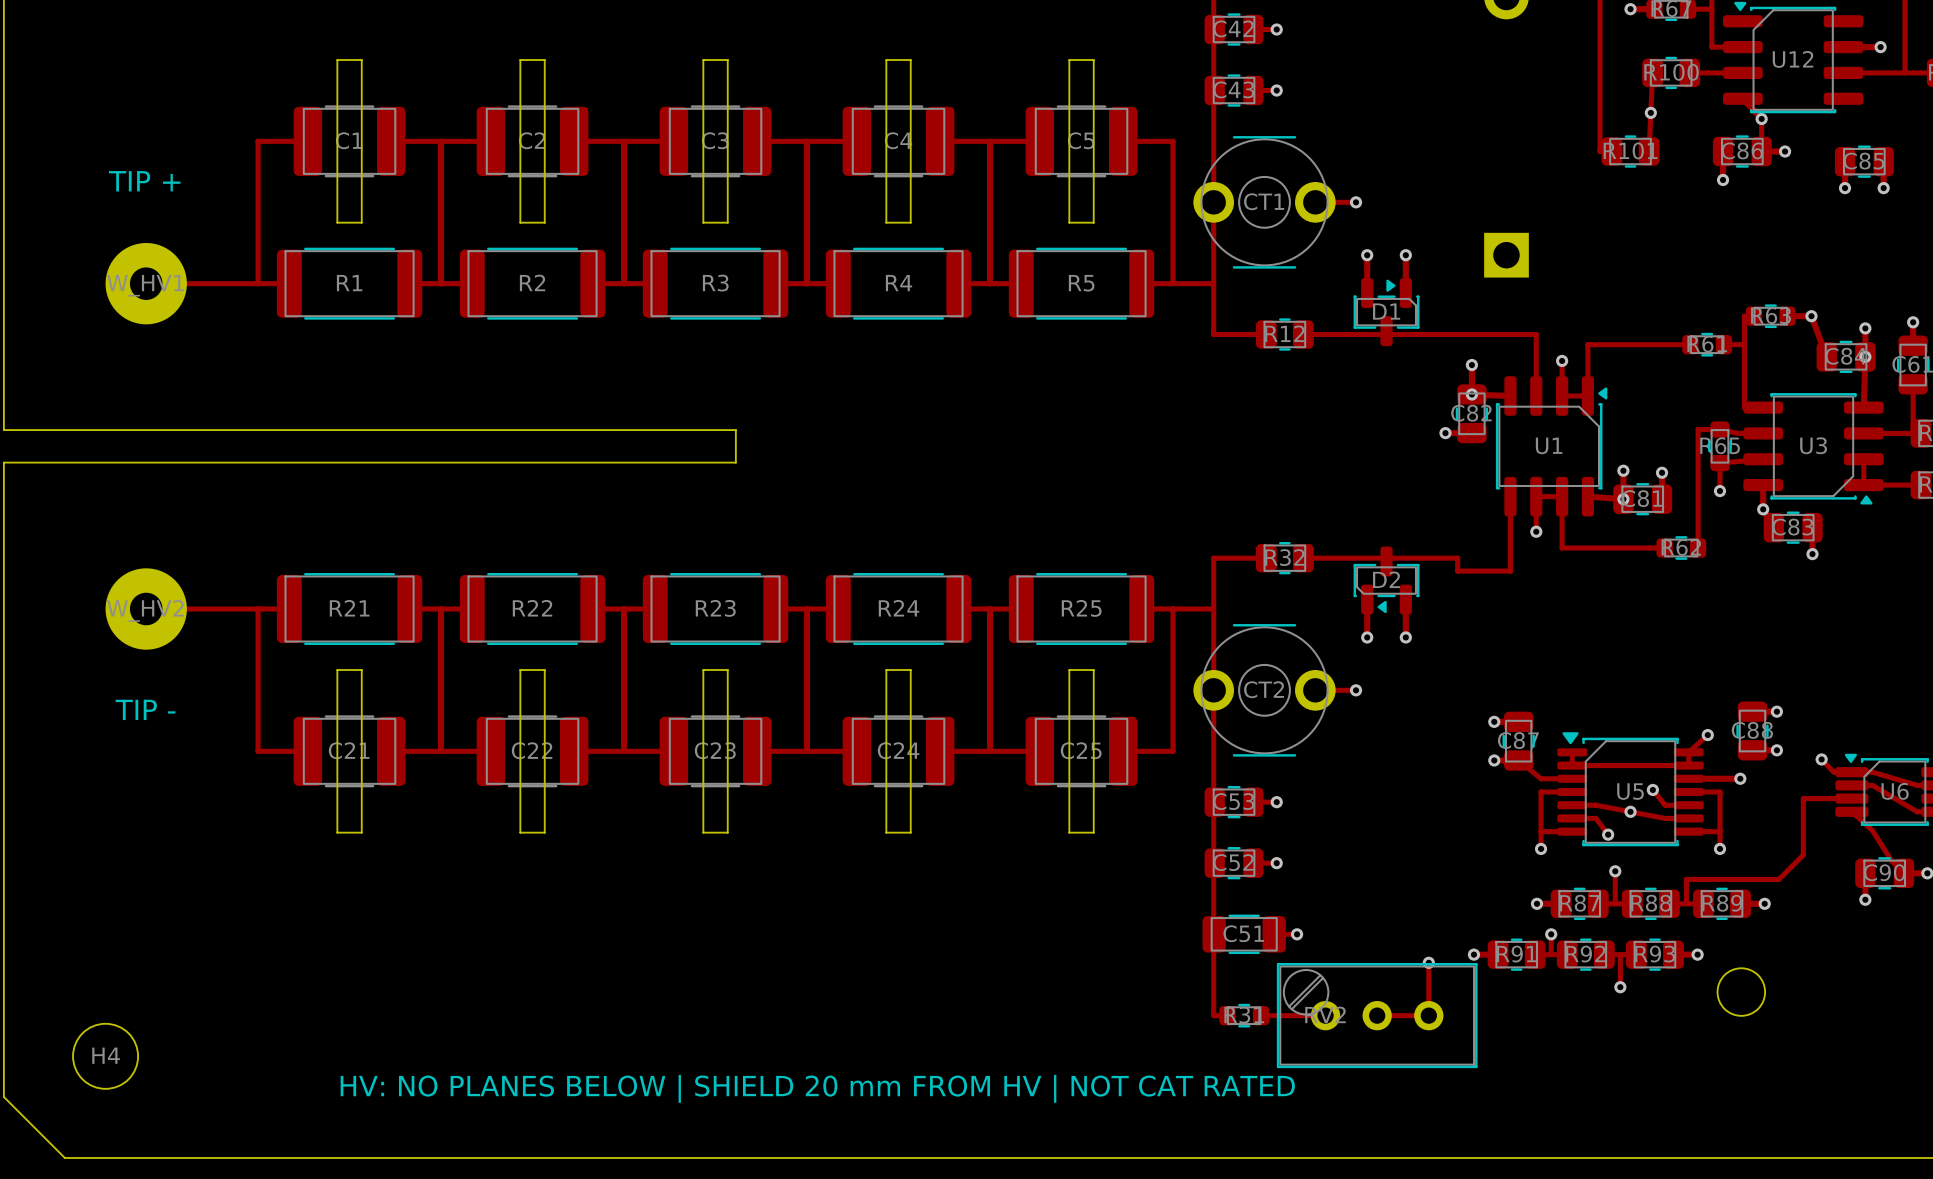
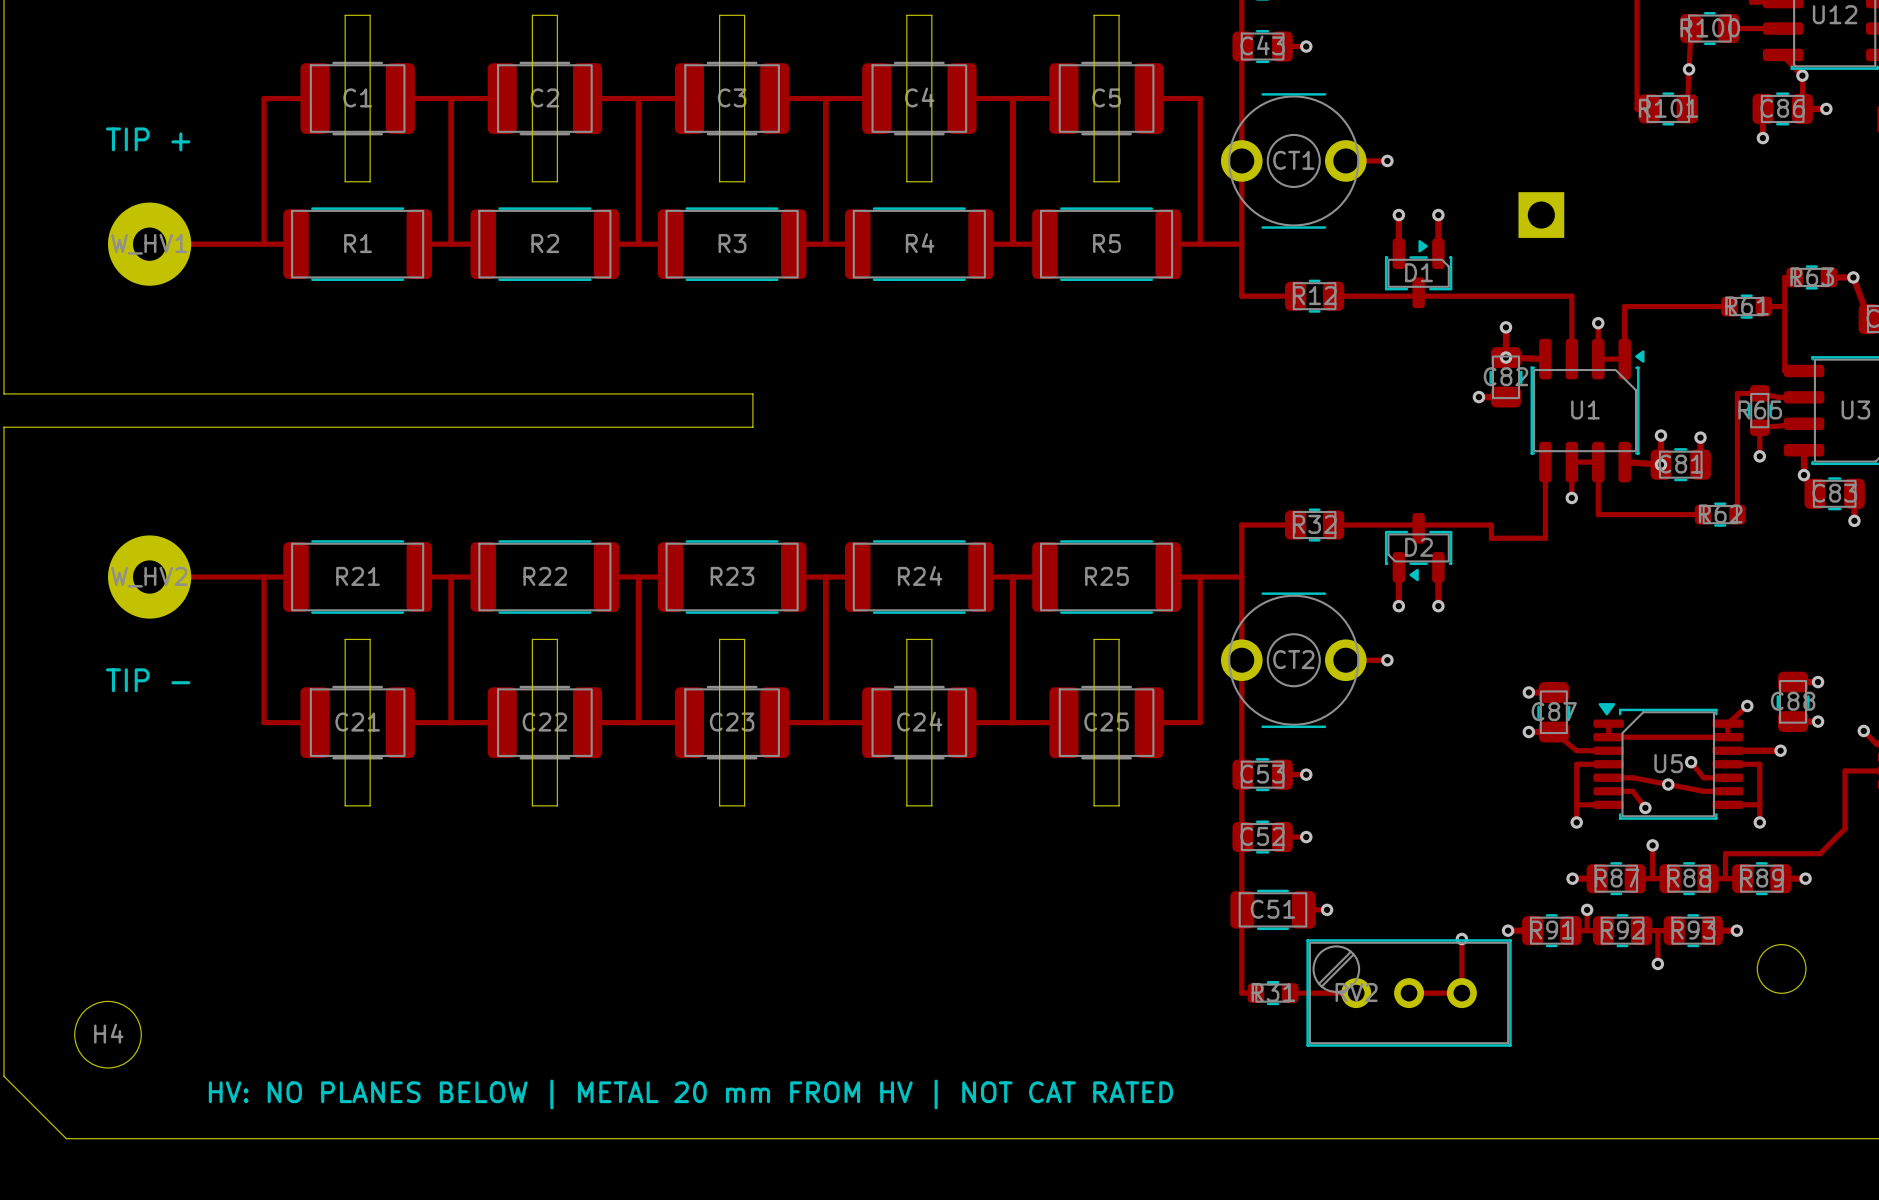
text: HV: NO PLANES BELOW | SHIELD 20 mm FROM HV | NOT CAT RATED (817, 1088) -> HV: NO PLANES BELOW | METAL 20 mm FROM HV | NOT CAT RATED (690, 1094)

